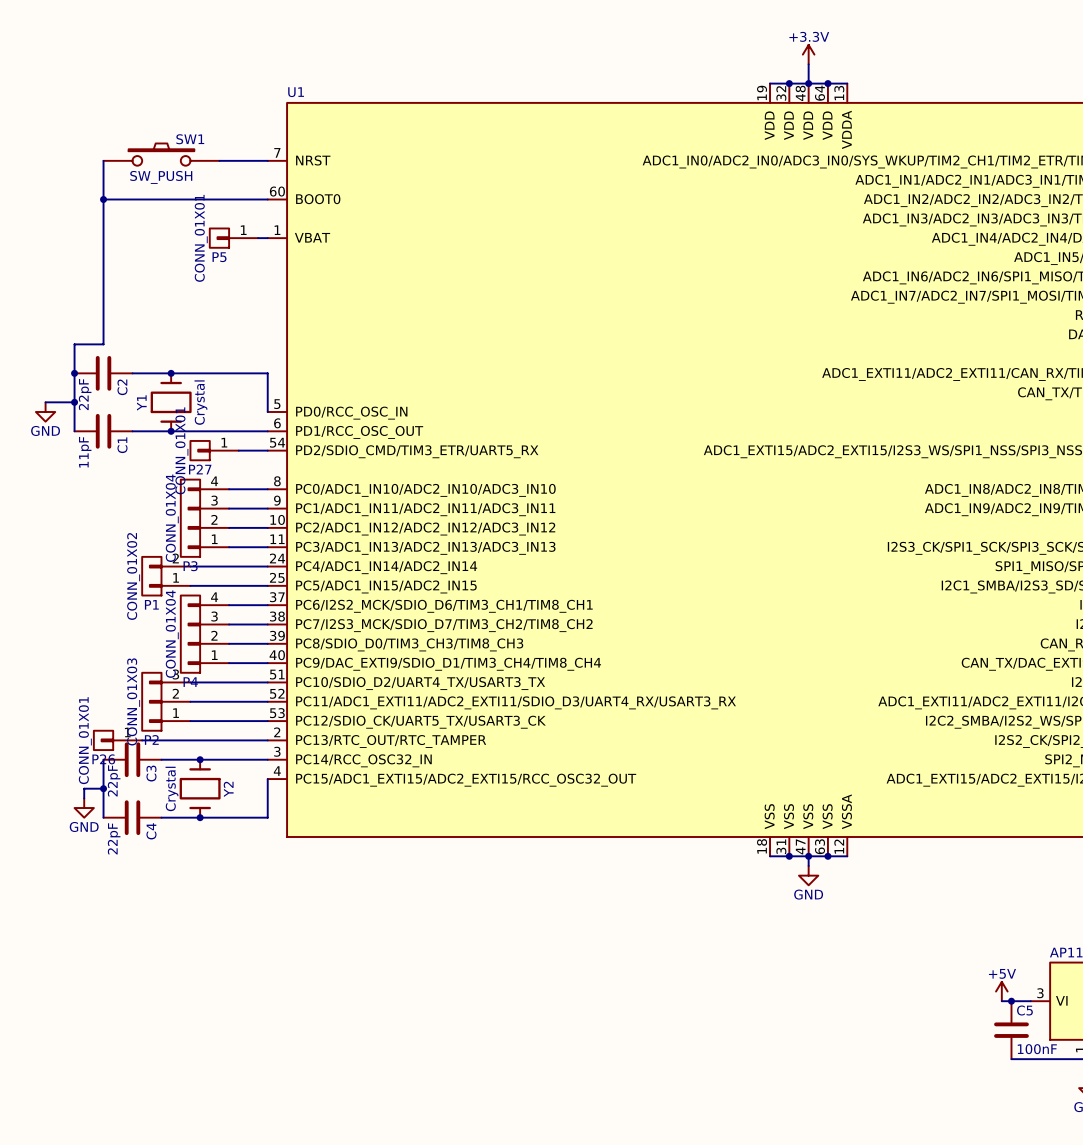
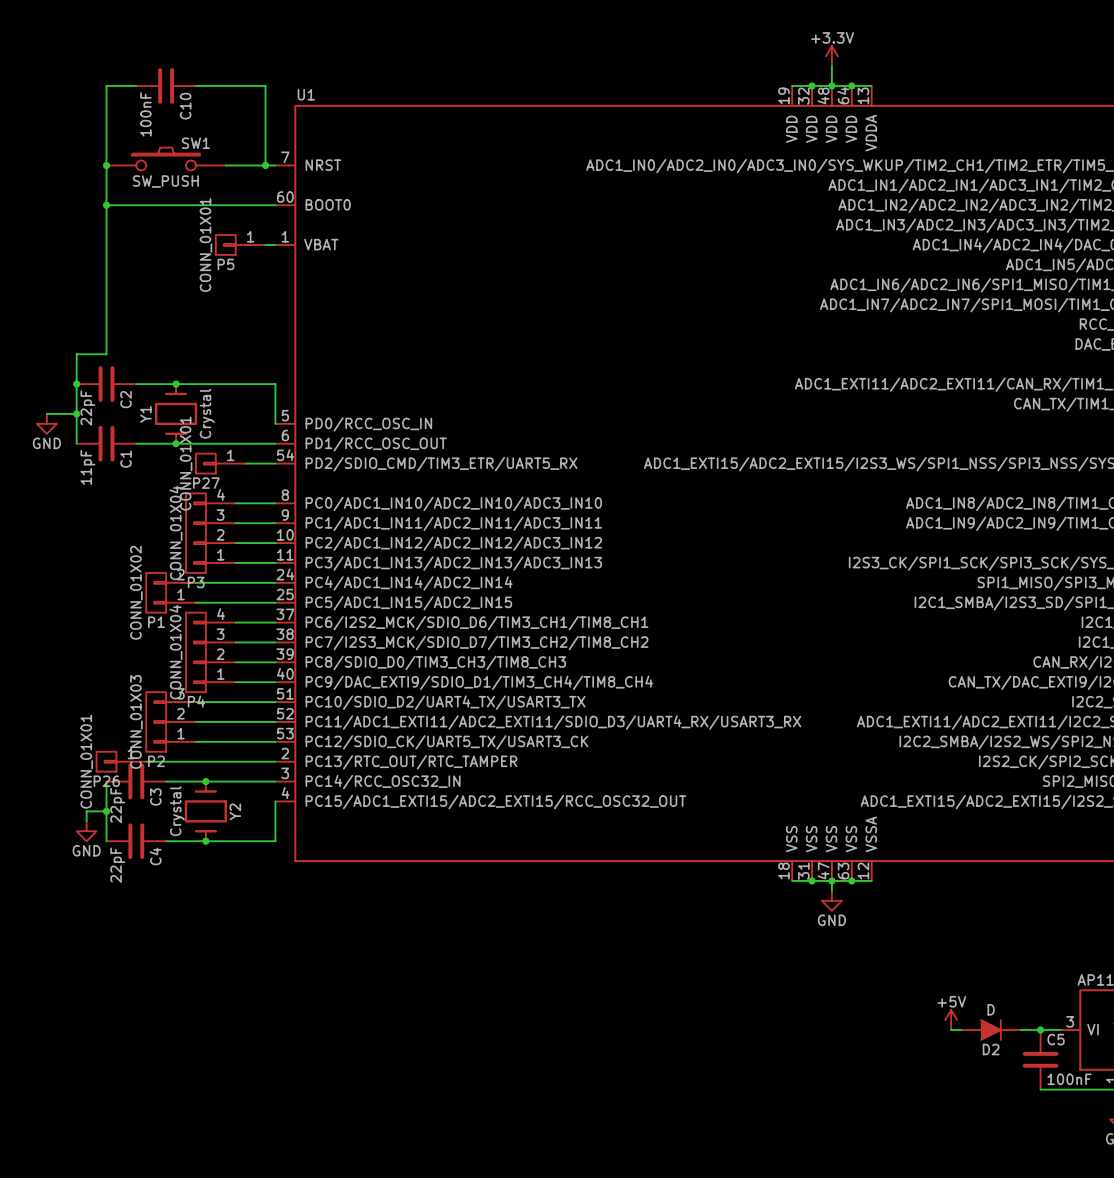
wire: none -> (136, 85) (106, 85) (106, 165)
C10: none -> 100nF (166, 85)
wire: none -> (195, 85) (265, 85) (265, 165)
junction: none -> (106, 165)
junction: none -> (265, 165)
power symbol position: +5V (1001, 991) -> +5V (951, 1020)
wire: none -> (951, 1030) (961, 1030)
D2: none -> D (990, 1030)
wire: none -> (1020, 1030) (1030, 1030)

